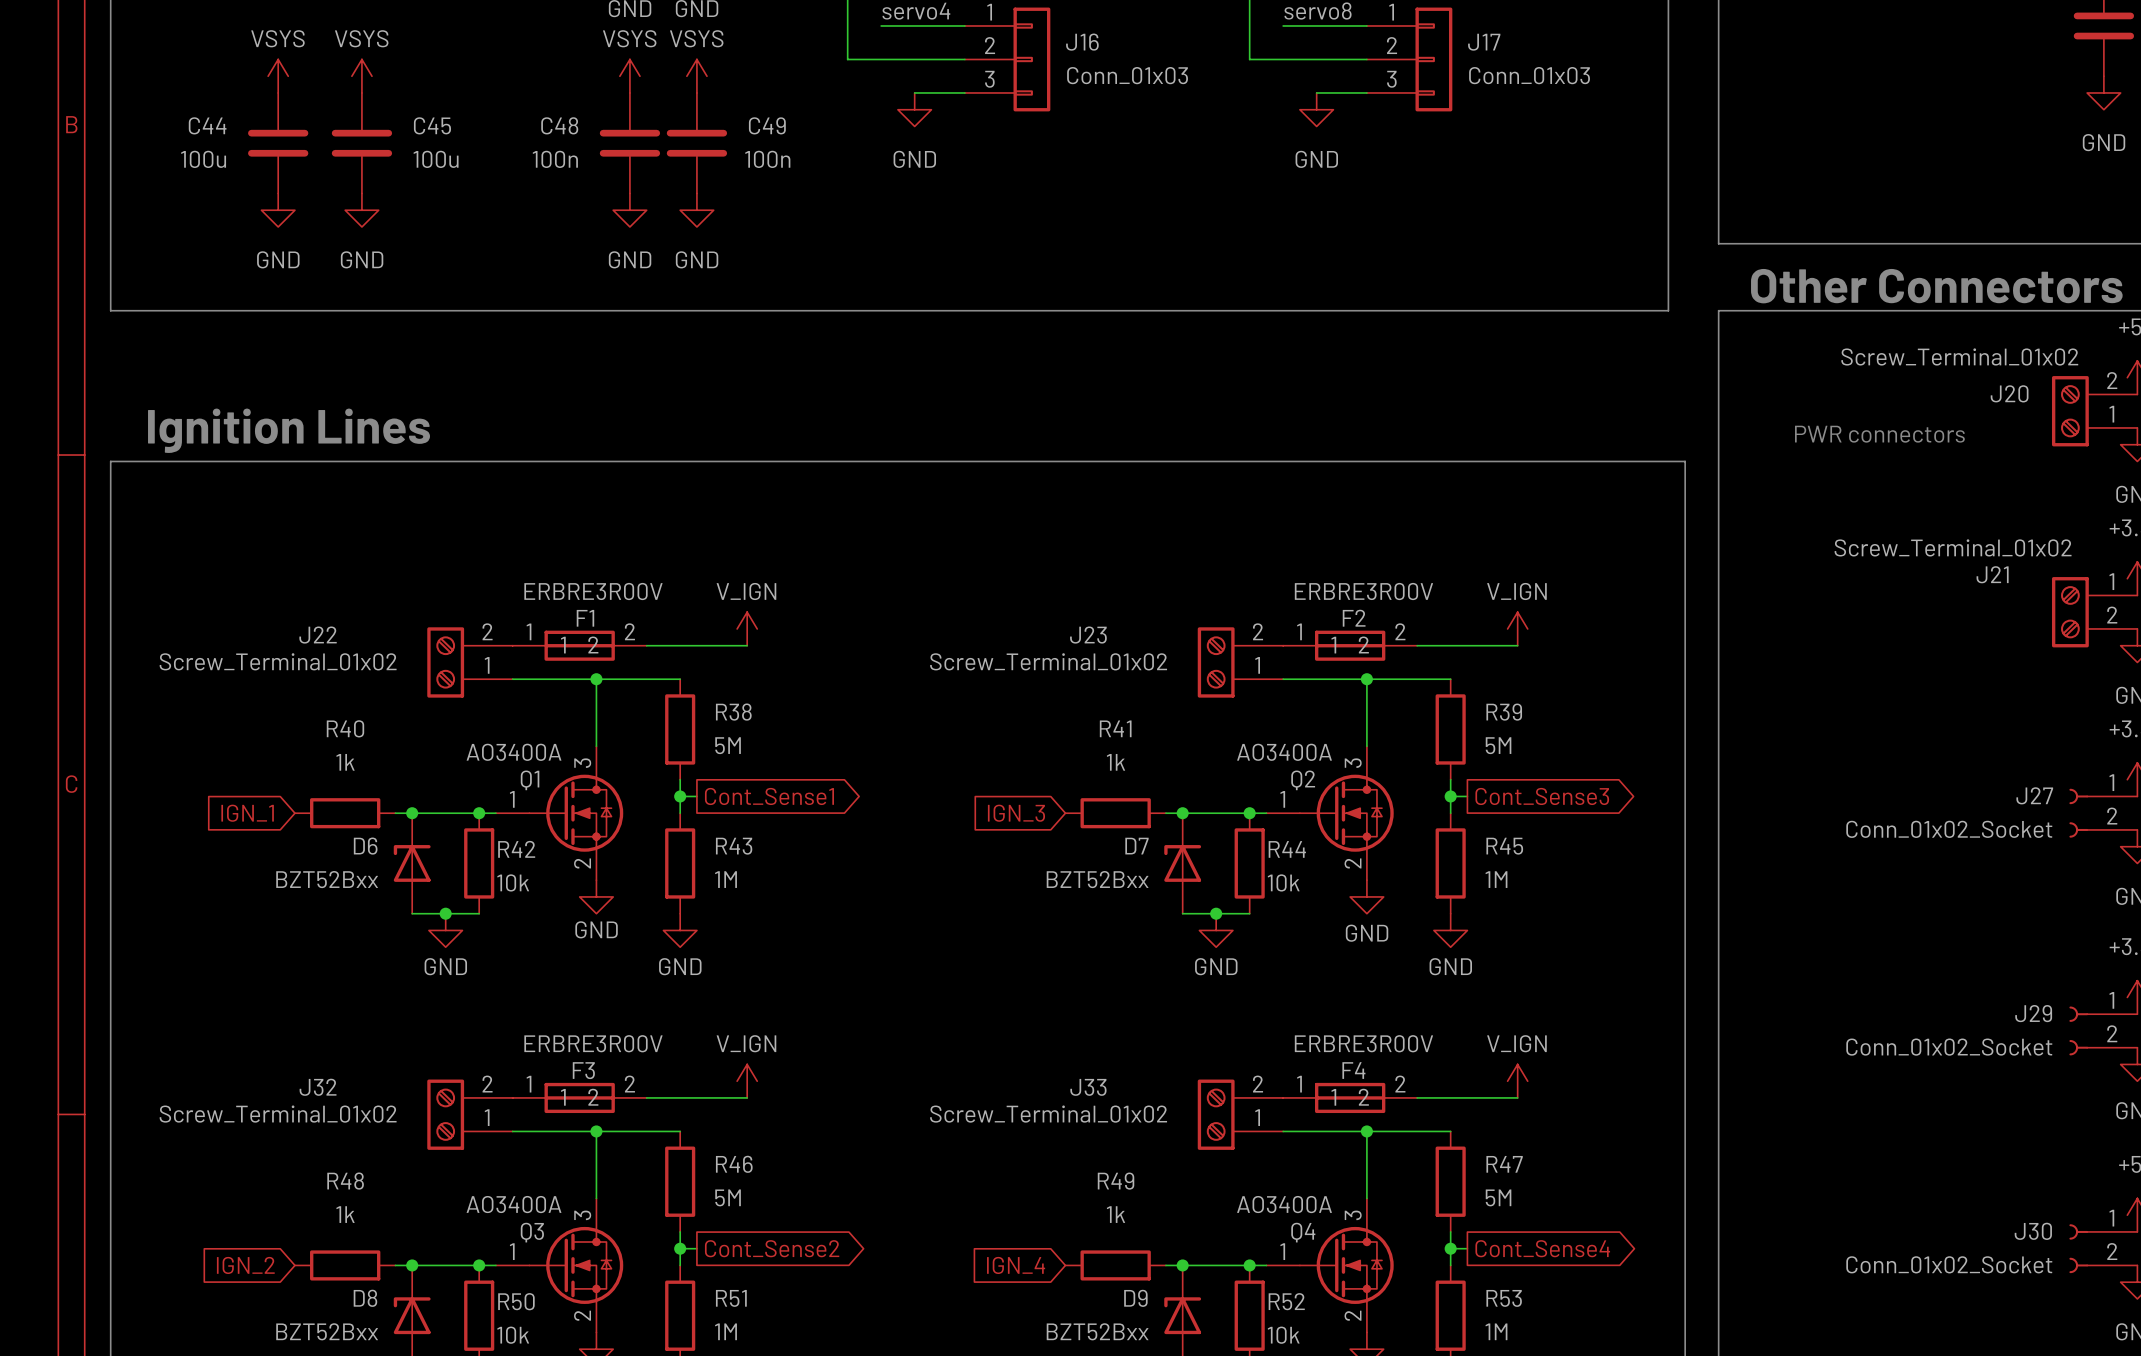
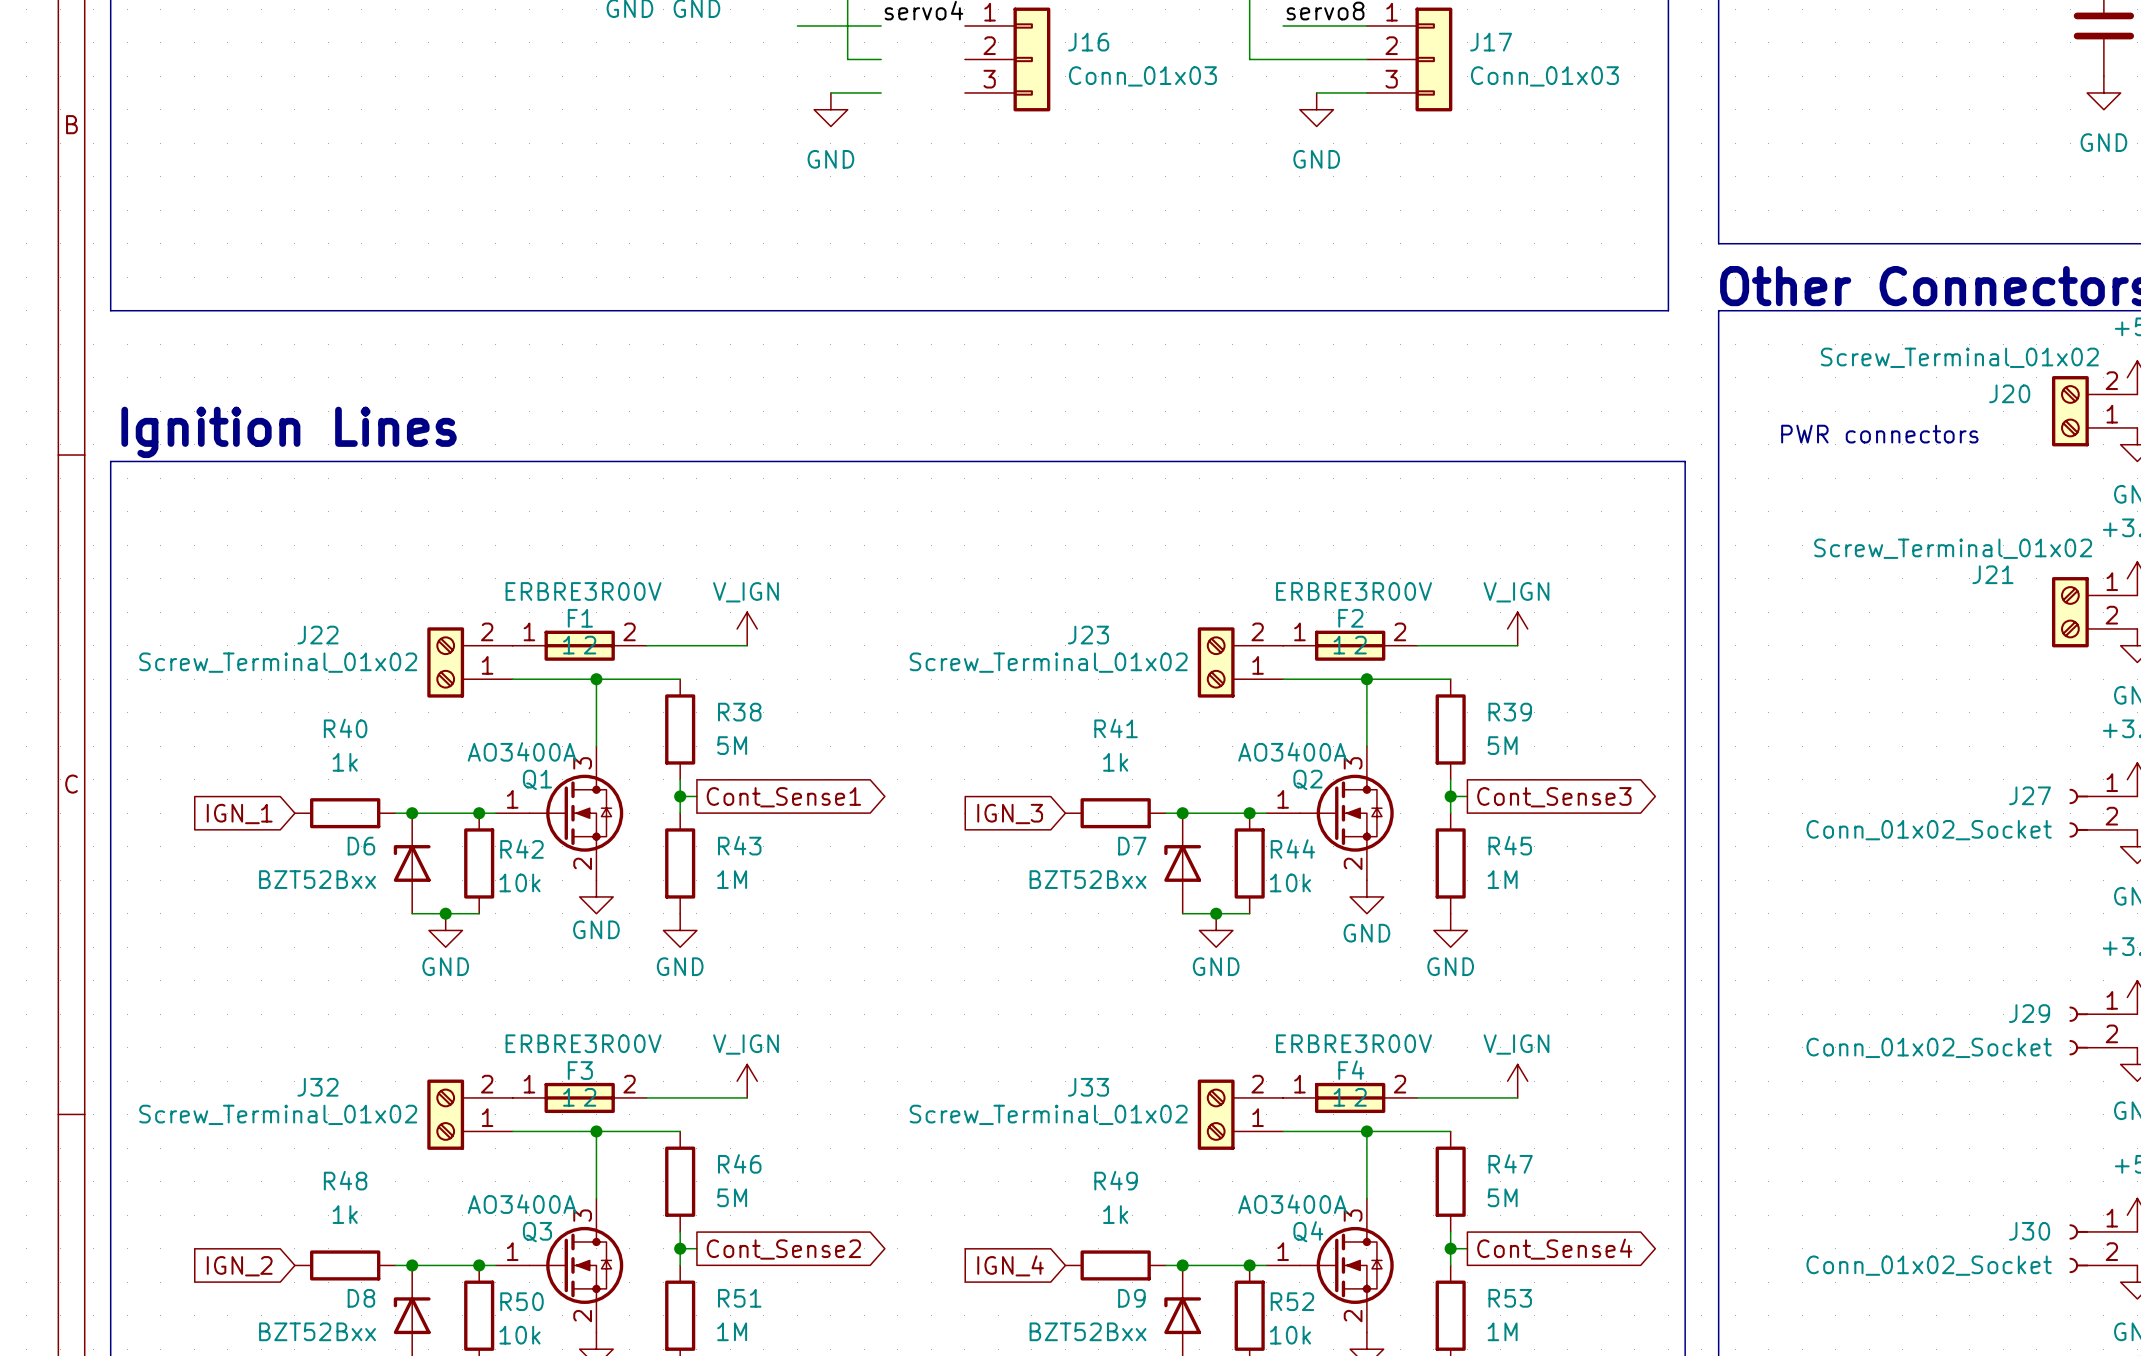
wire: (881, 25) (964, 25) -> (881, 25) (797, 25)
wire: (881, 59) (964, 59) -> none
power symbol: VSYS (278, 76) -> none
power symbol: VSYS (361, 76) -> none
power symbol: VSYS (629, 76) -> none
power symbol: VSYS (696, 76) -> none
wire: (914, 92) (964, 92) -> (830, 92) (881, 92)
power symbol: none -> GND (830, 109)
power symbol: GND (914, 109) -> none
C44: 100u (278, 143) -> none
C45: 100u (361, 143) -> none
C48: 100n (629, 143) -> none
C49: 100n (696, 143) -> none
power symbol: GND (278, 210) -> none
power symbol: GND (361, 210) -> none
power symbol: GND (629, 210) -> none
power symbol: GND (696, 210) -> none

